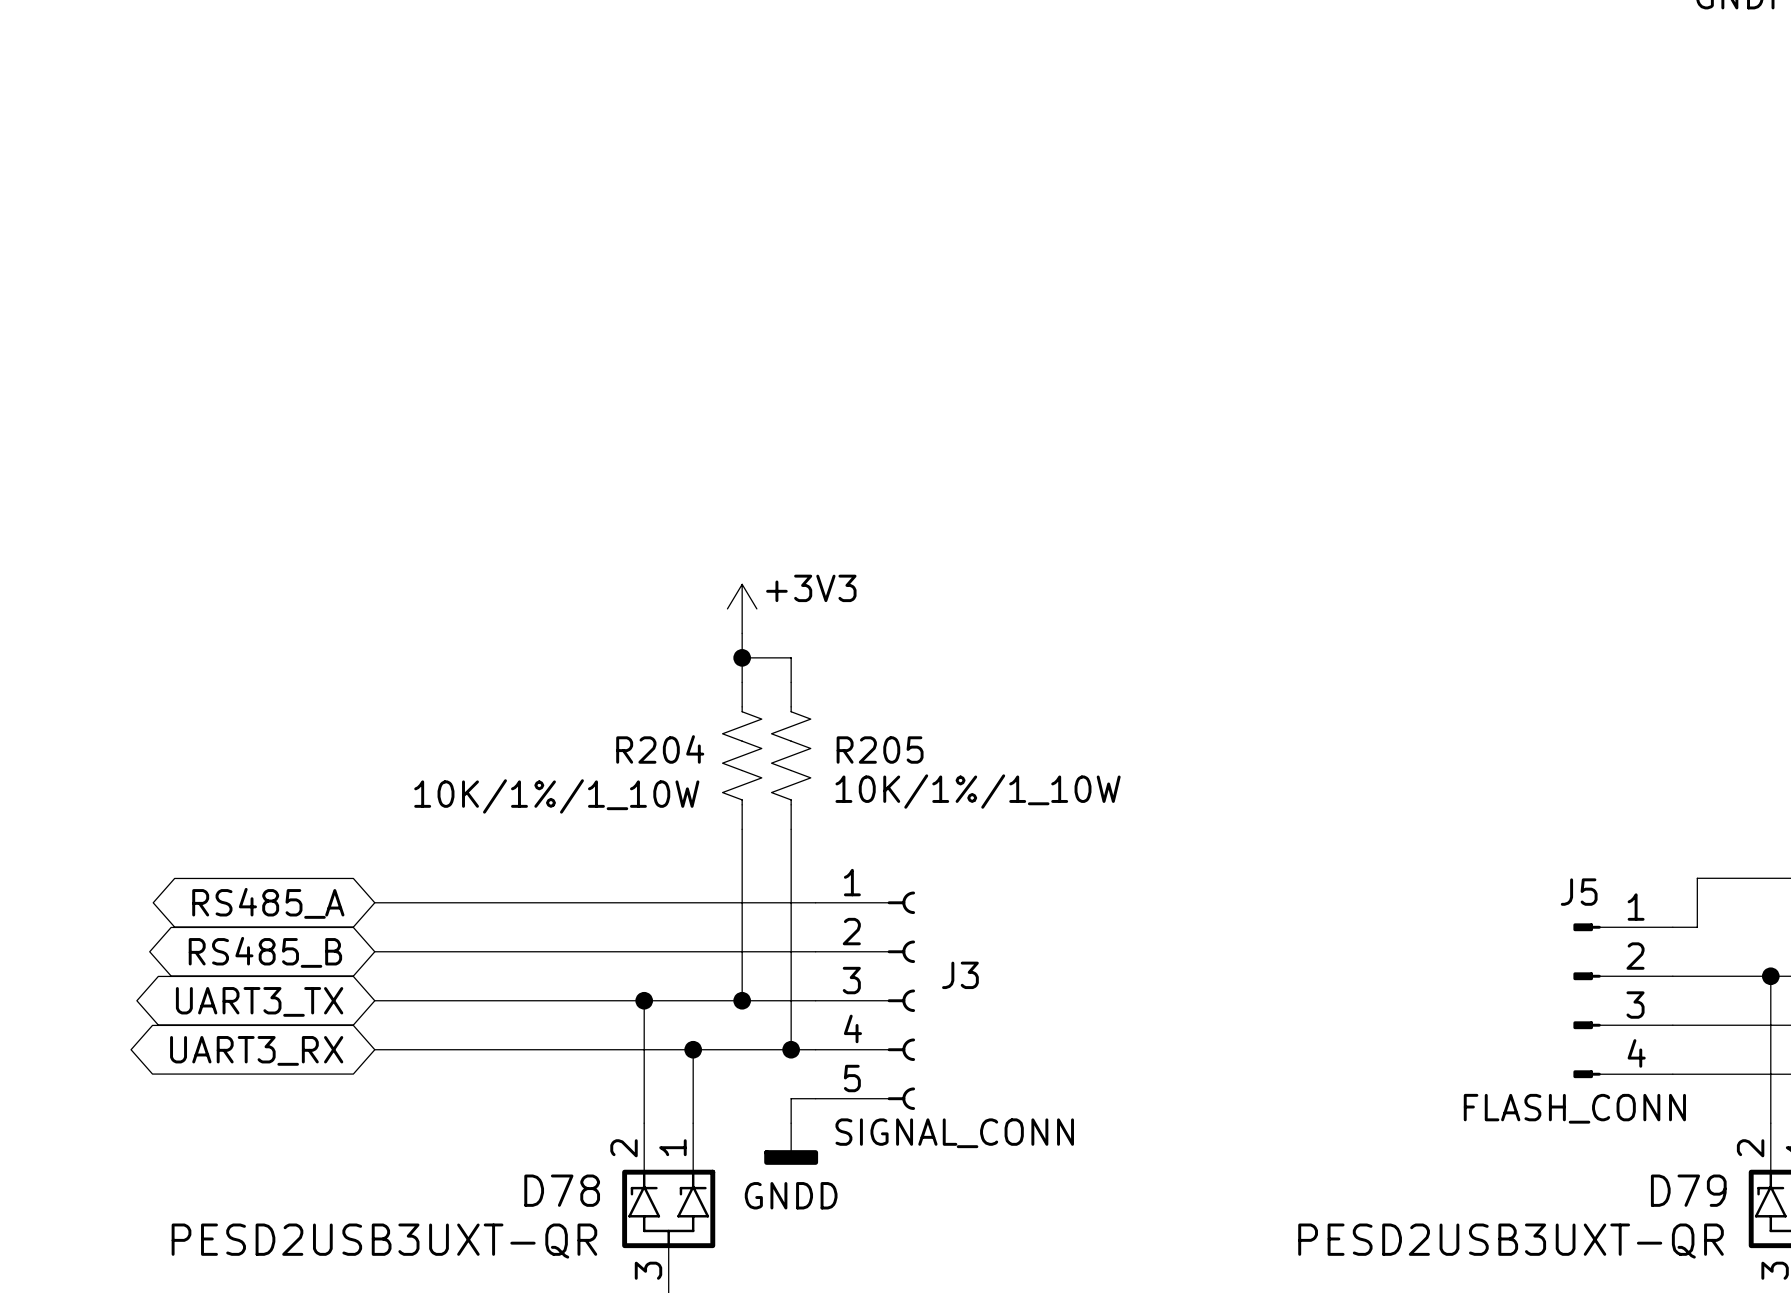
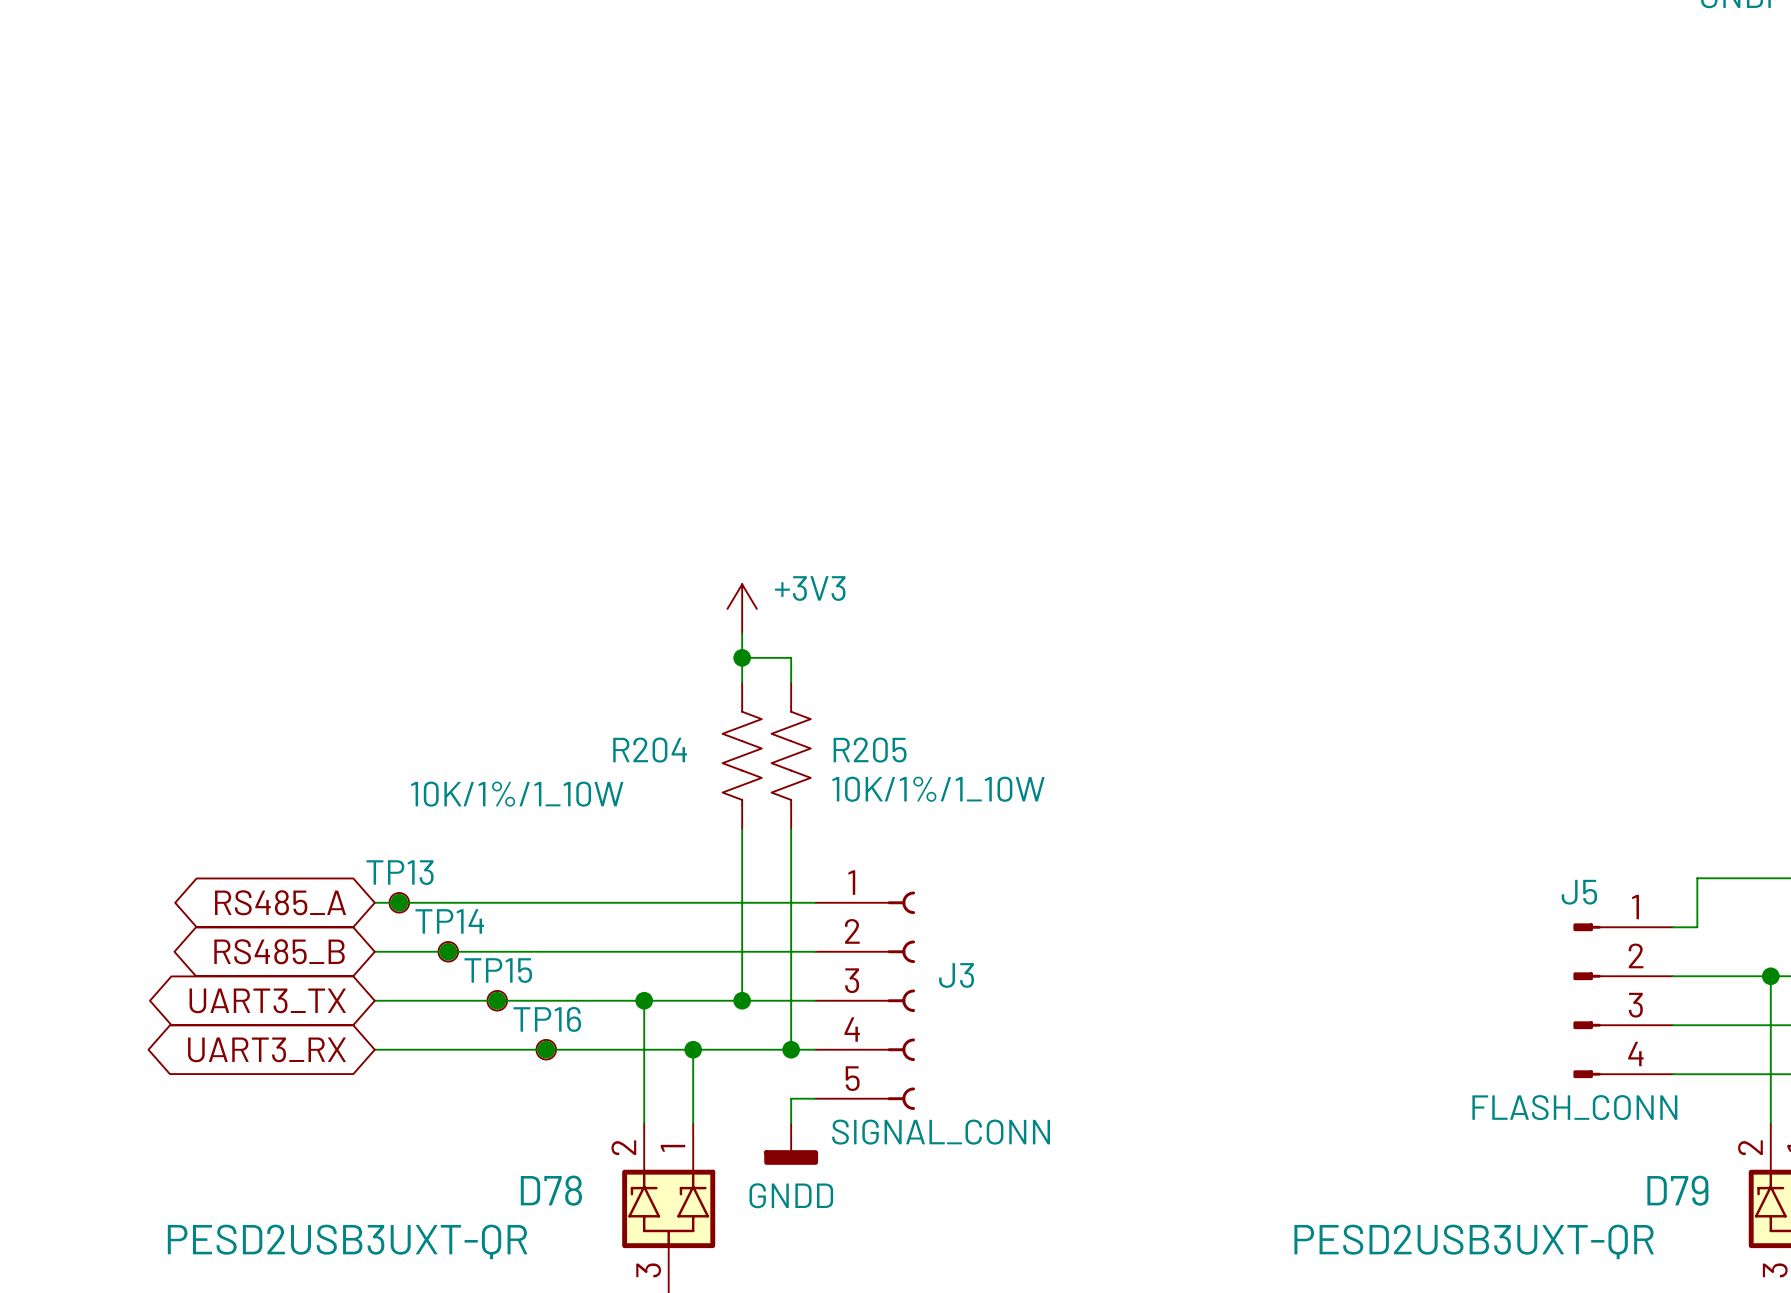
junction: none -> (399, 902)
TP13: none -> (399, 902)
junction: none -> (448, 951)
TP14: none -> (448, 951)
junction: none -> (497, 1000)
TP15: none -> (497, 1000)
junction: none -> (546, 1049)
TP16: none -> (546, 1049)

